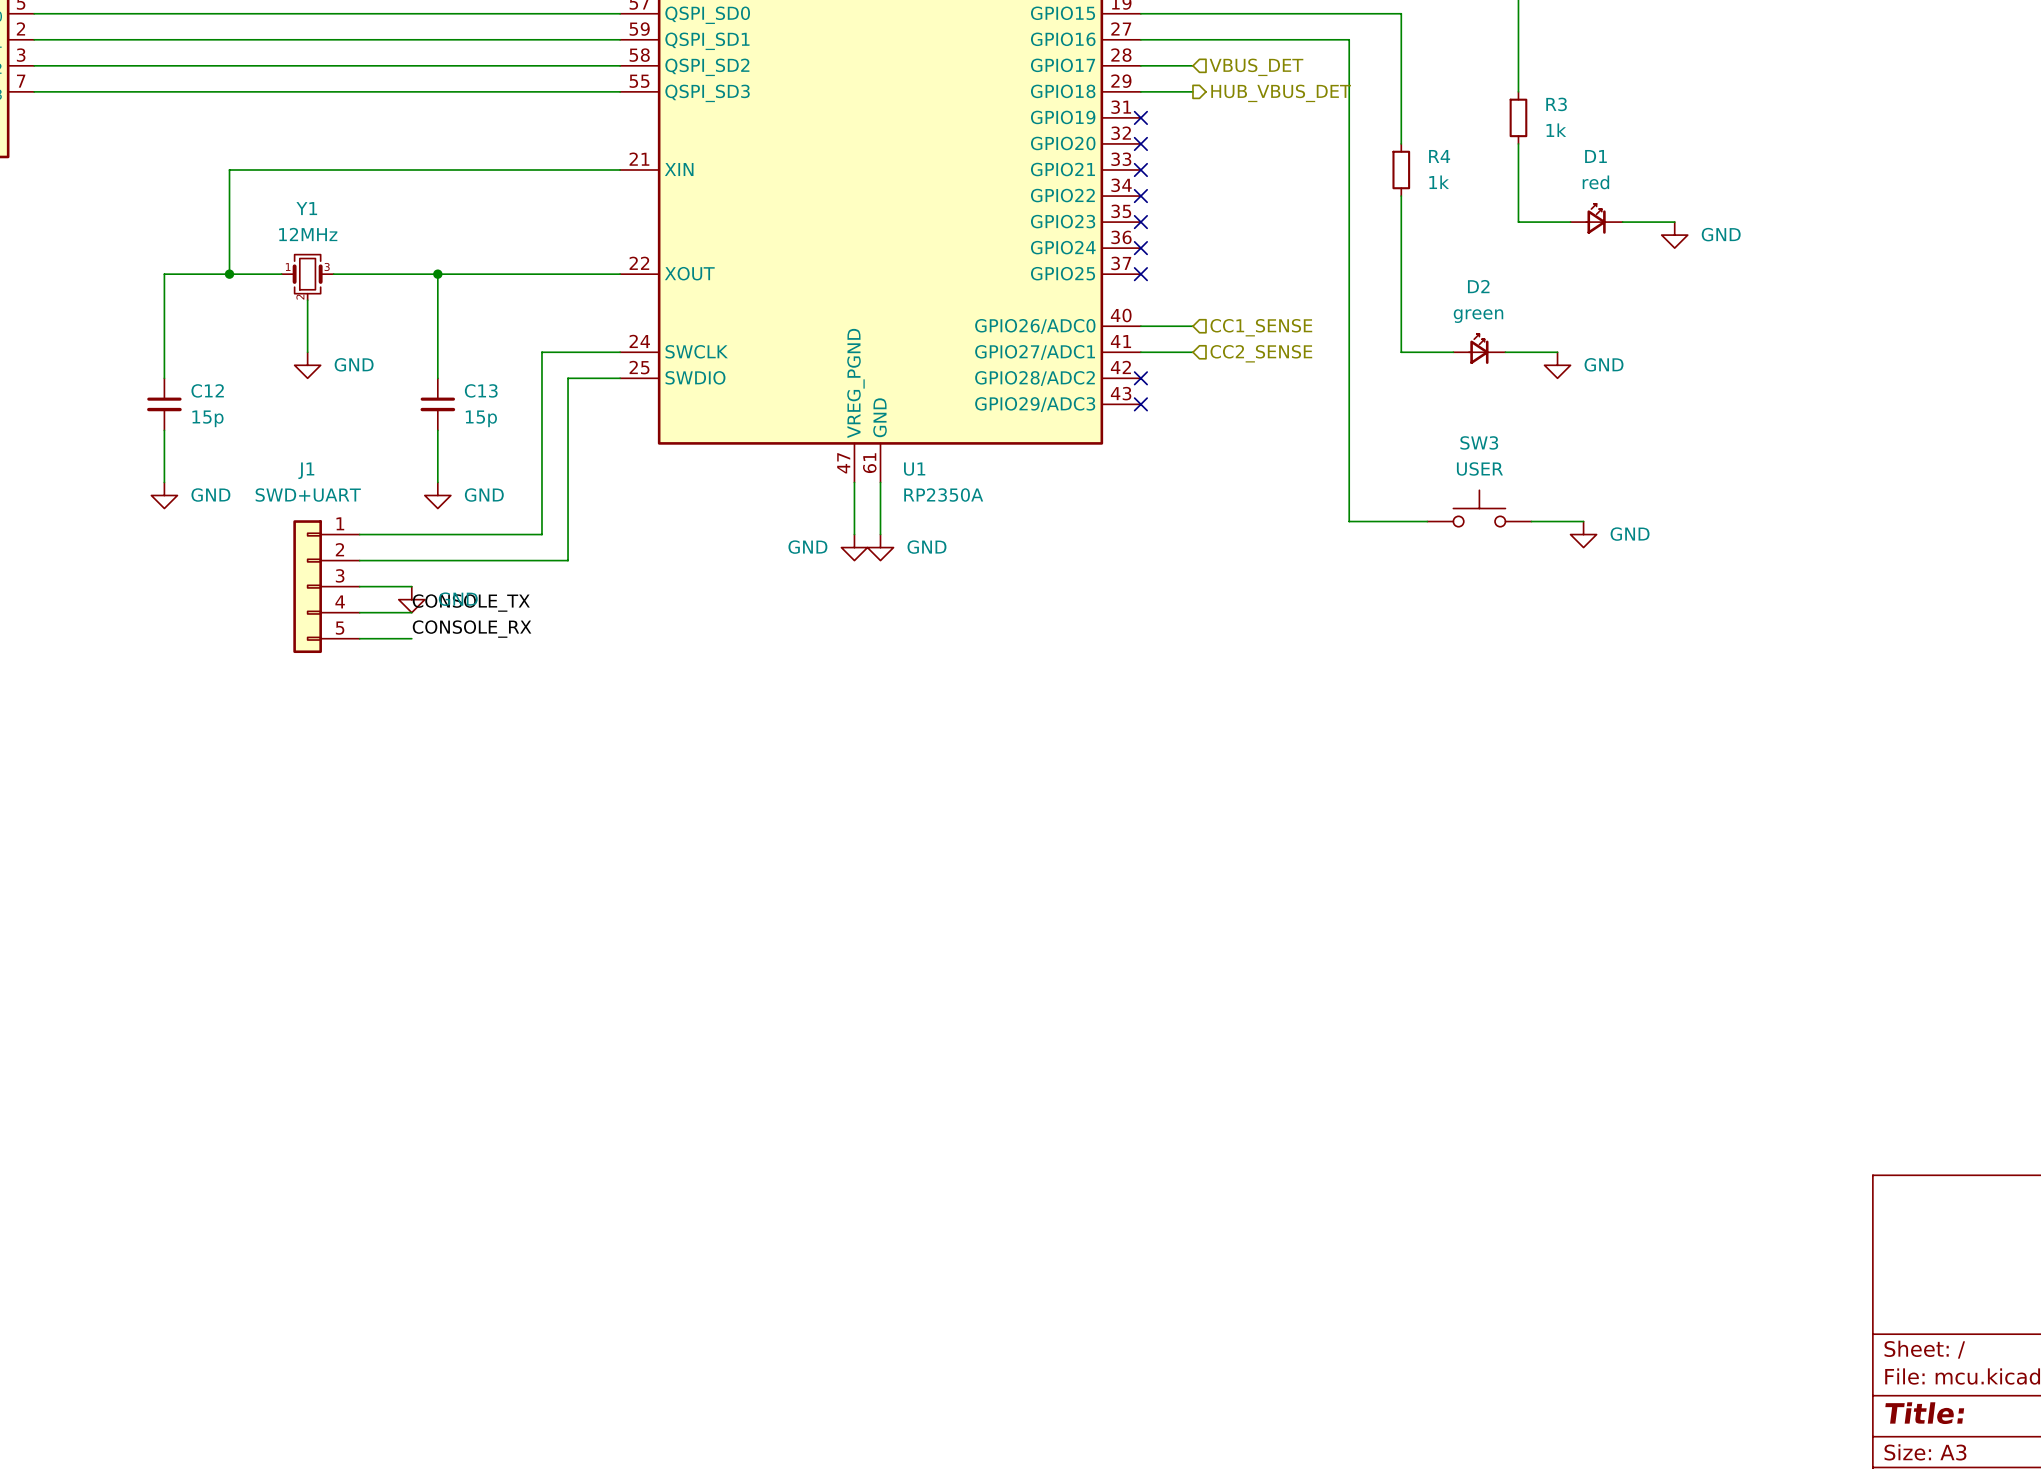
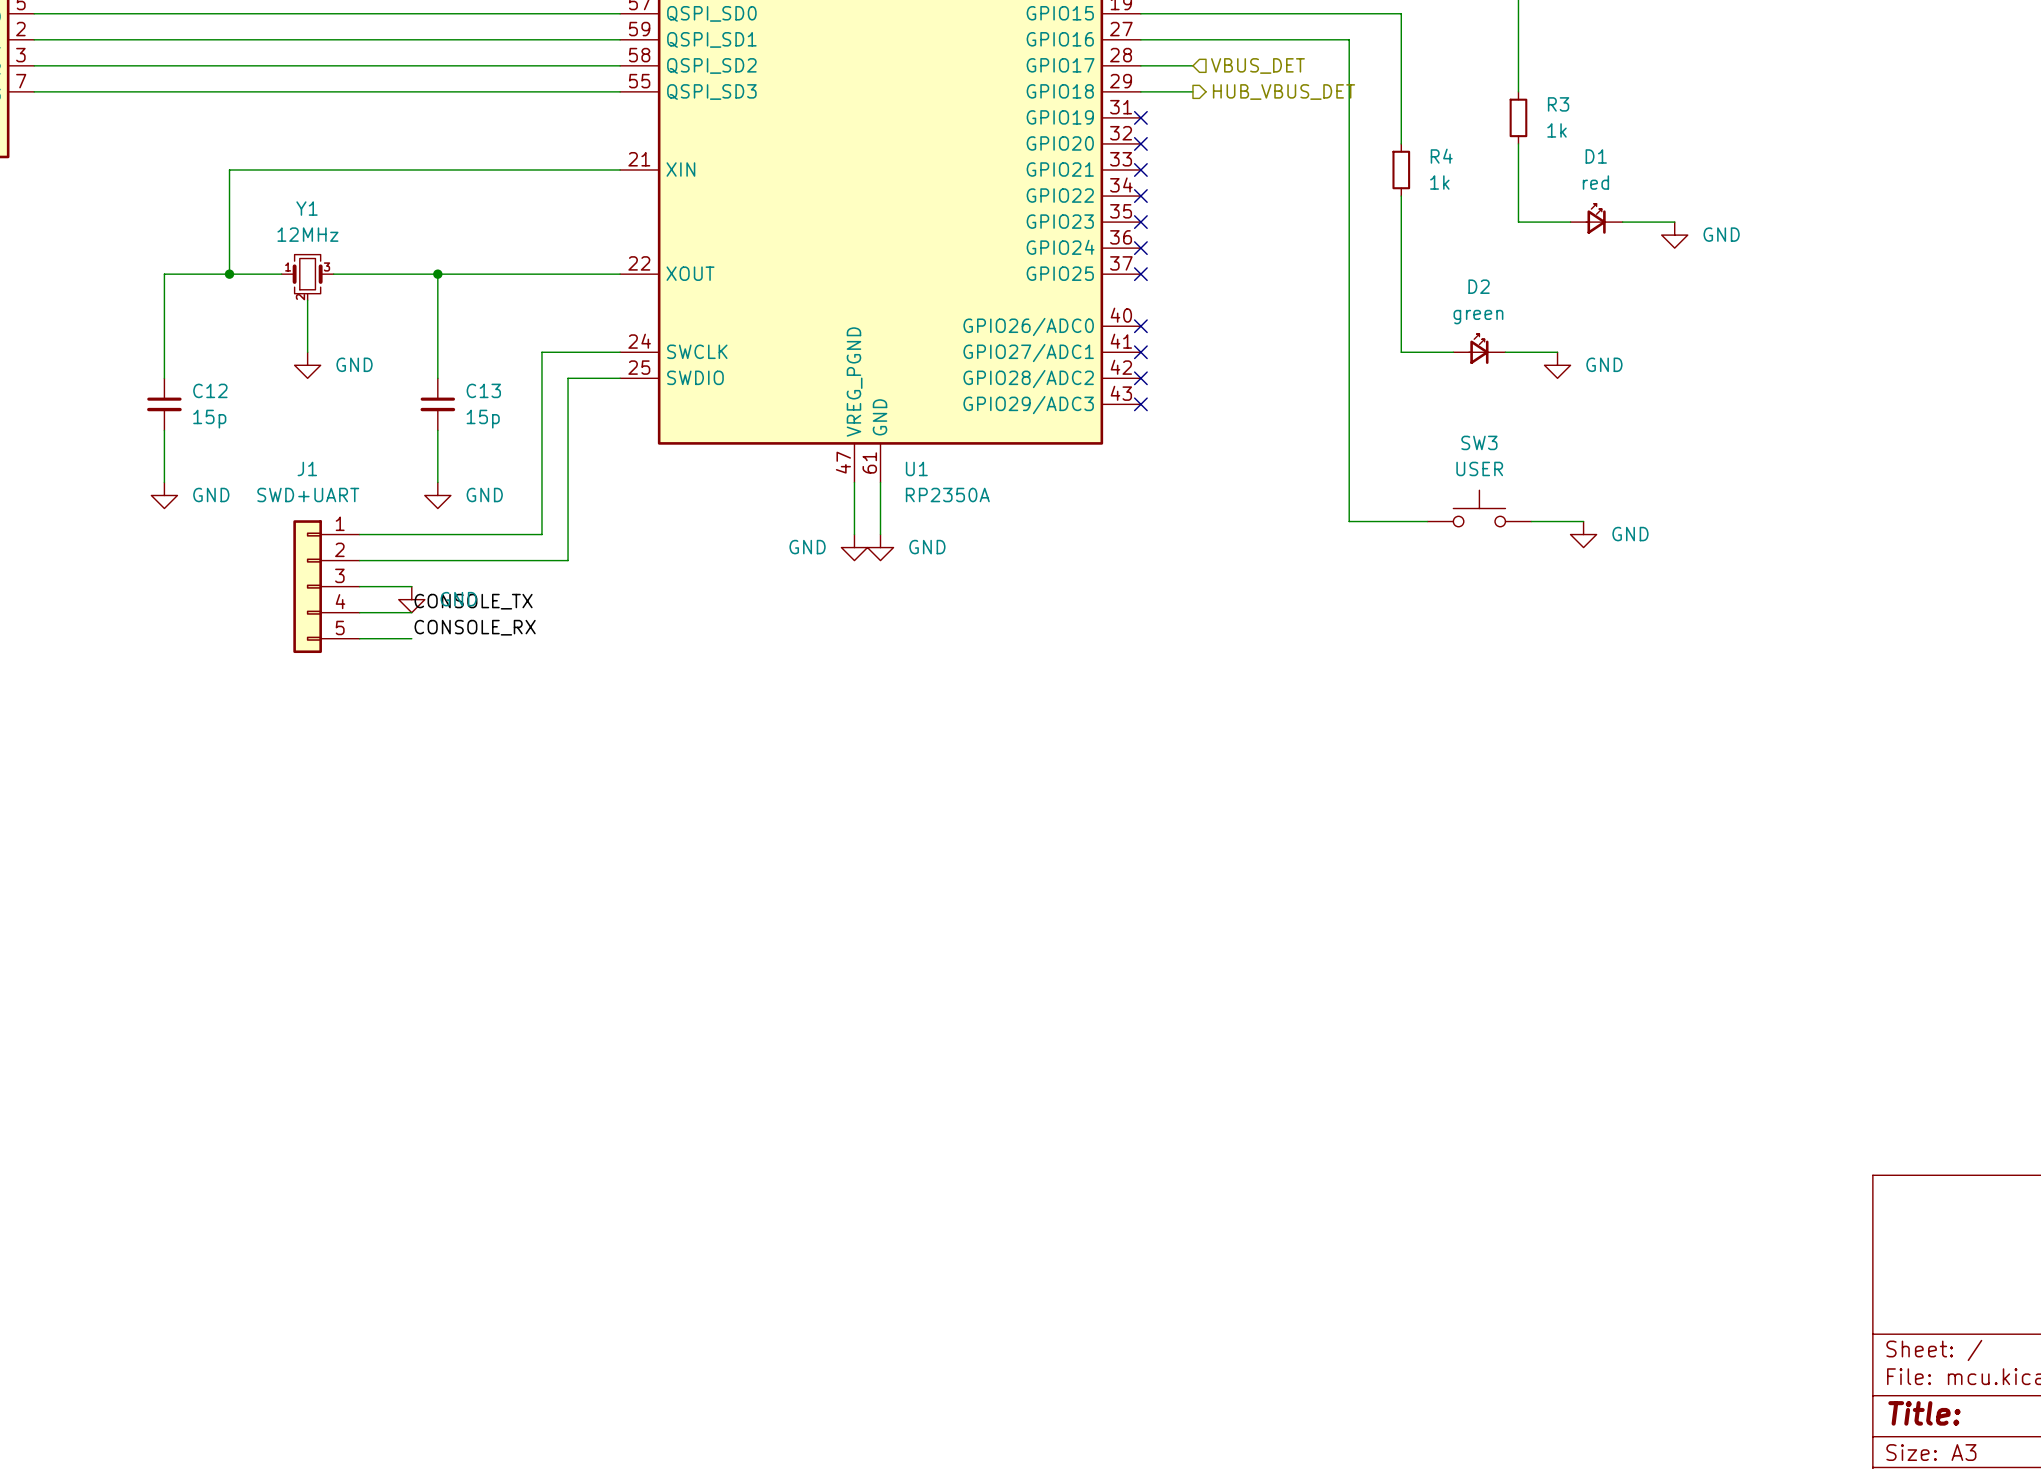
wire: (1140, 326) (1192, 326) -> none
no-connect mark: none -> (1140, 326)
hierarchical label: CC1_SENSE (1261, 327) -> none
wire: (1140, 352) (1192, 352) -> none
no-connect mark: none -> (1140, 352)
hierarchical label: CC2_SENSE (1261, 353) -> none

